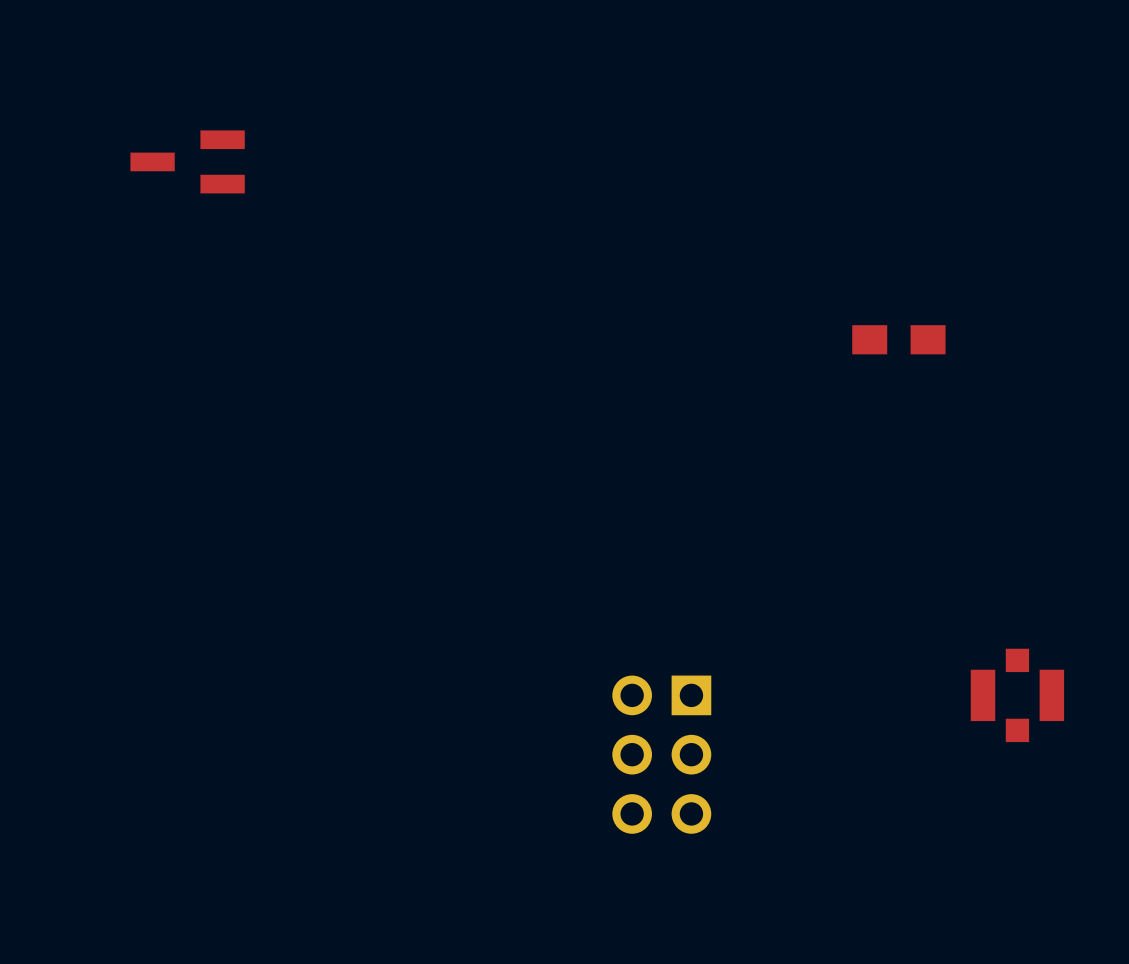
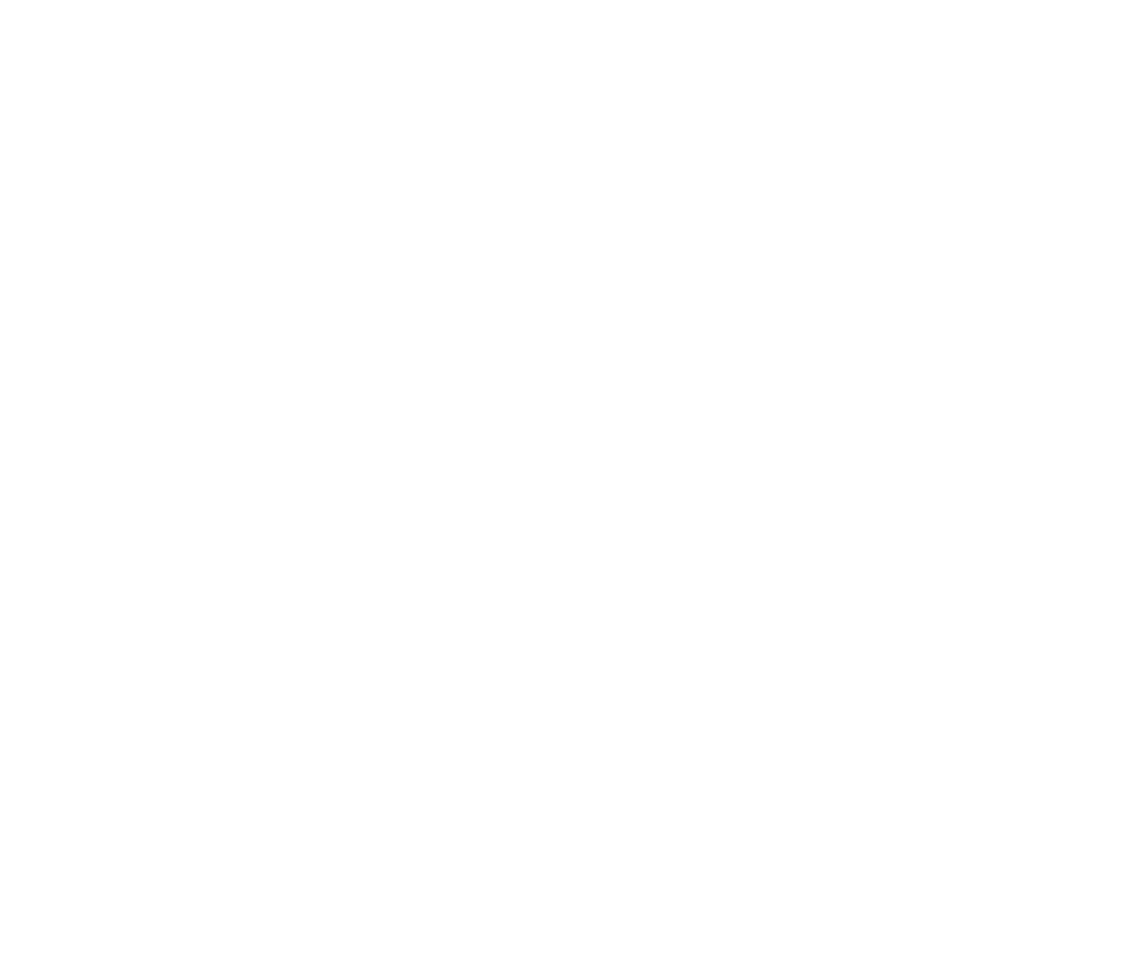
part: (187, 161) -> none
part: (898, 339) -> none
part: (1017, 695) -> none
part: (661, 754) -> none

